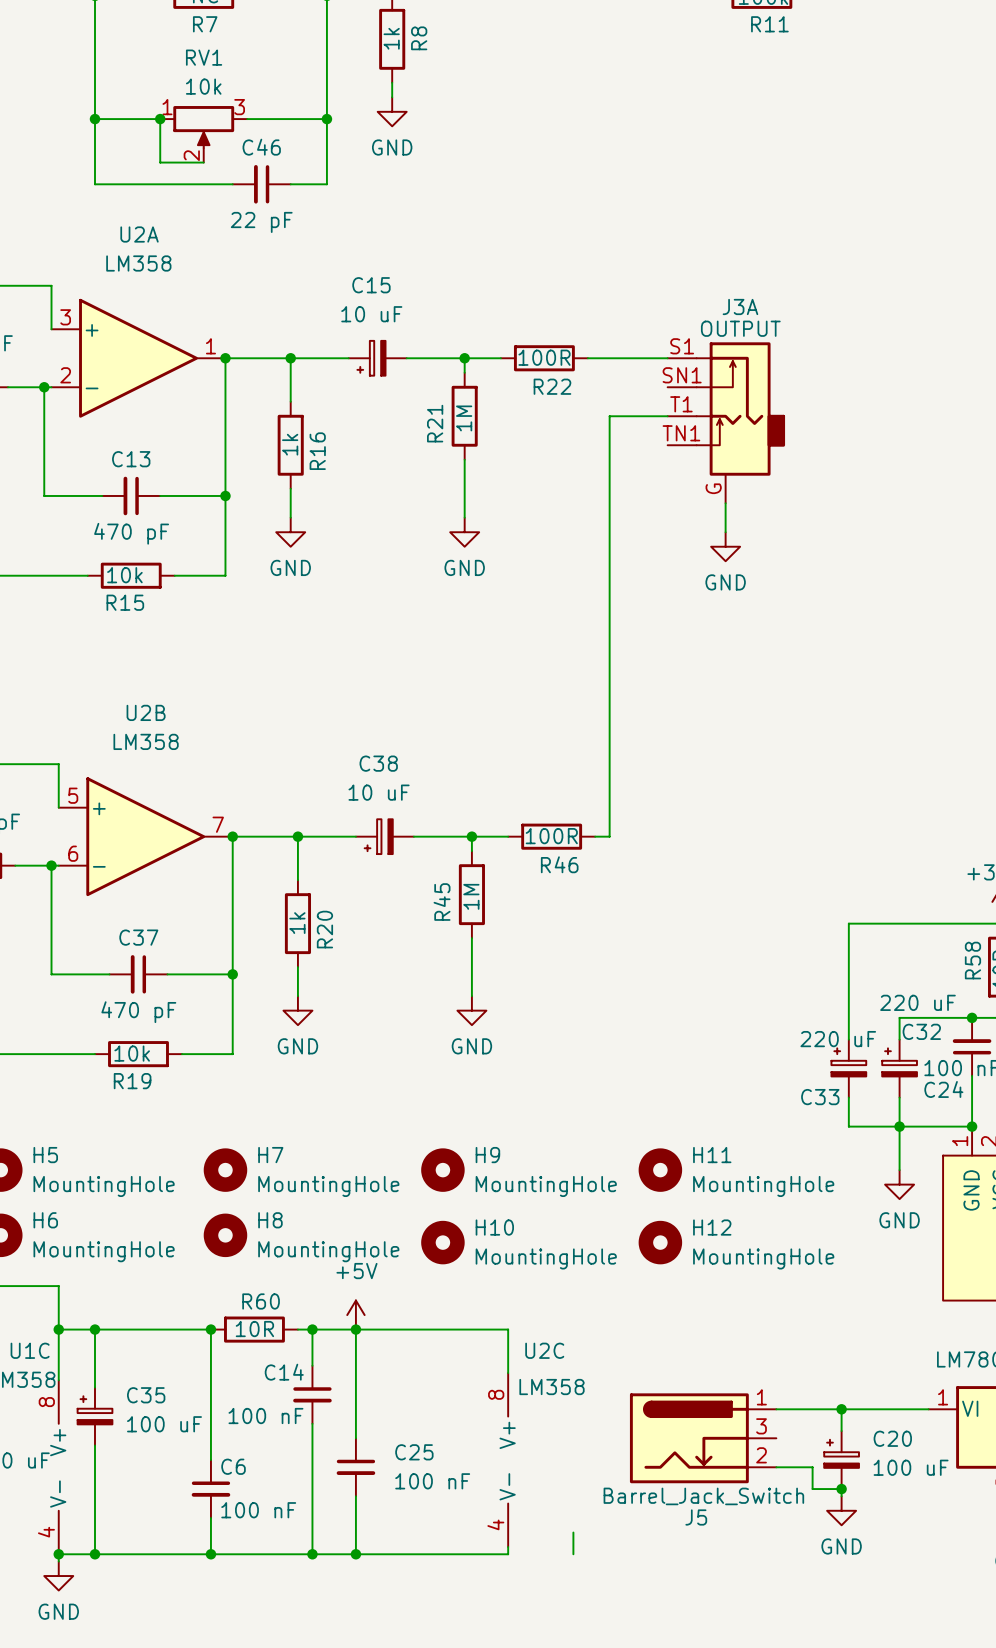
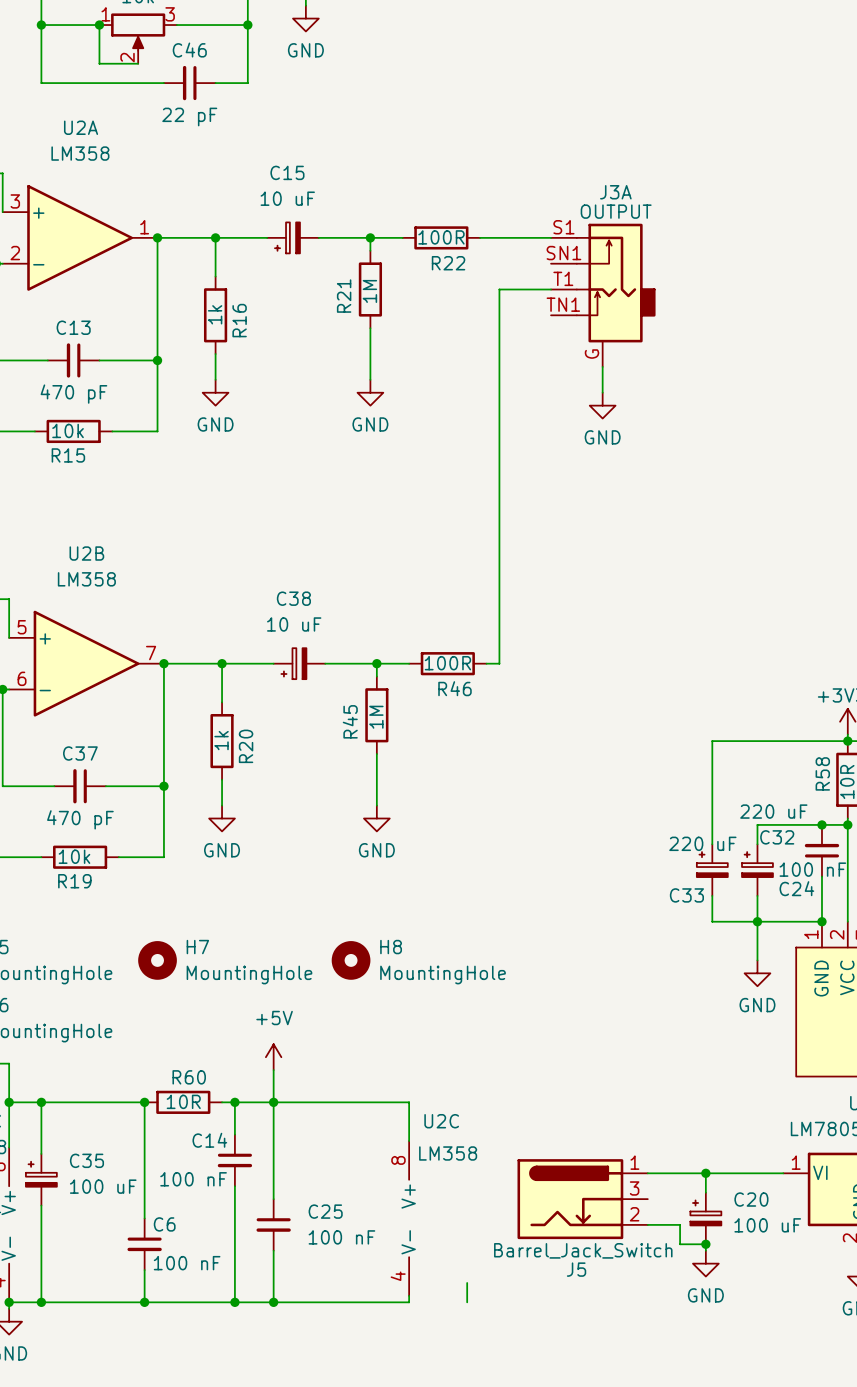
H9 name: H9 (487, 1155) -> H8 (391, 947)
H11: MountingHole (660, 1170) -> none
H8: MountingHole (225, 1235) -> none
H10: MountingHole (442, 1242) -> none
H12: MountingHole (660, 1242) -> none
power symbol position: +5V (355, 1315) -> +5V (273, 1057)

